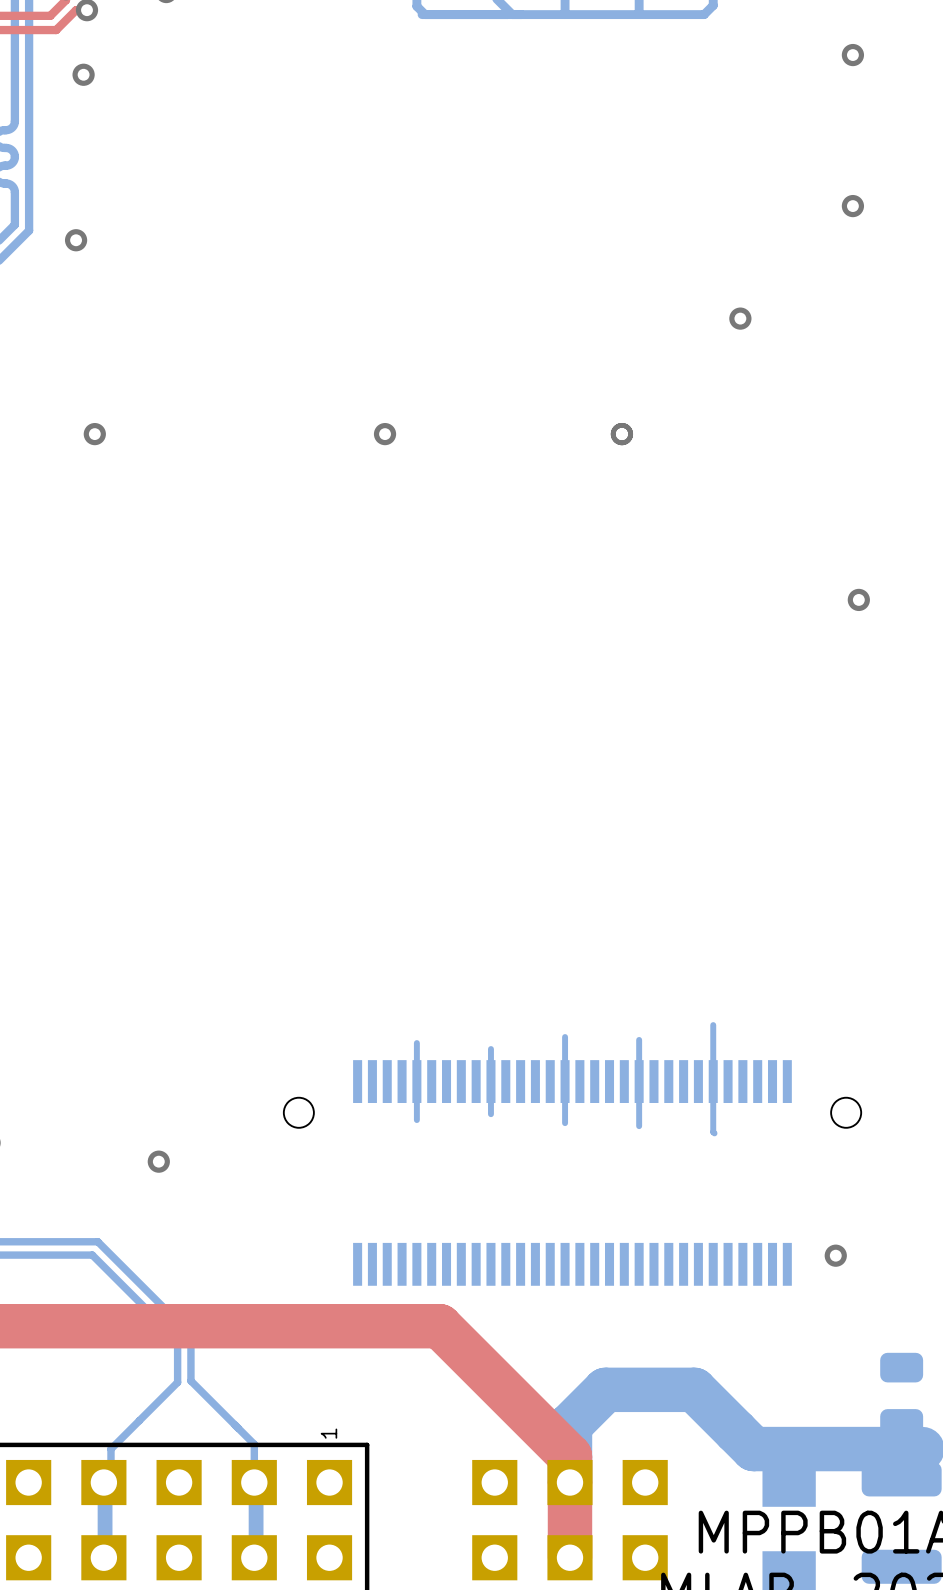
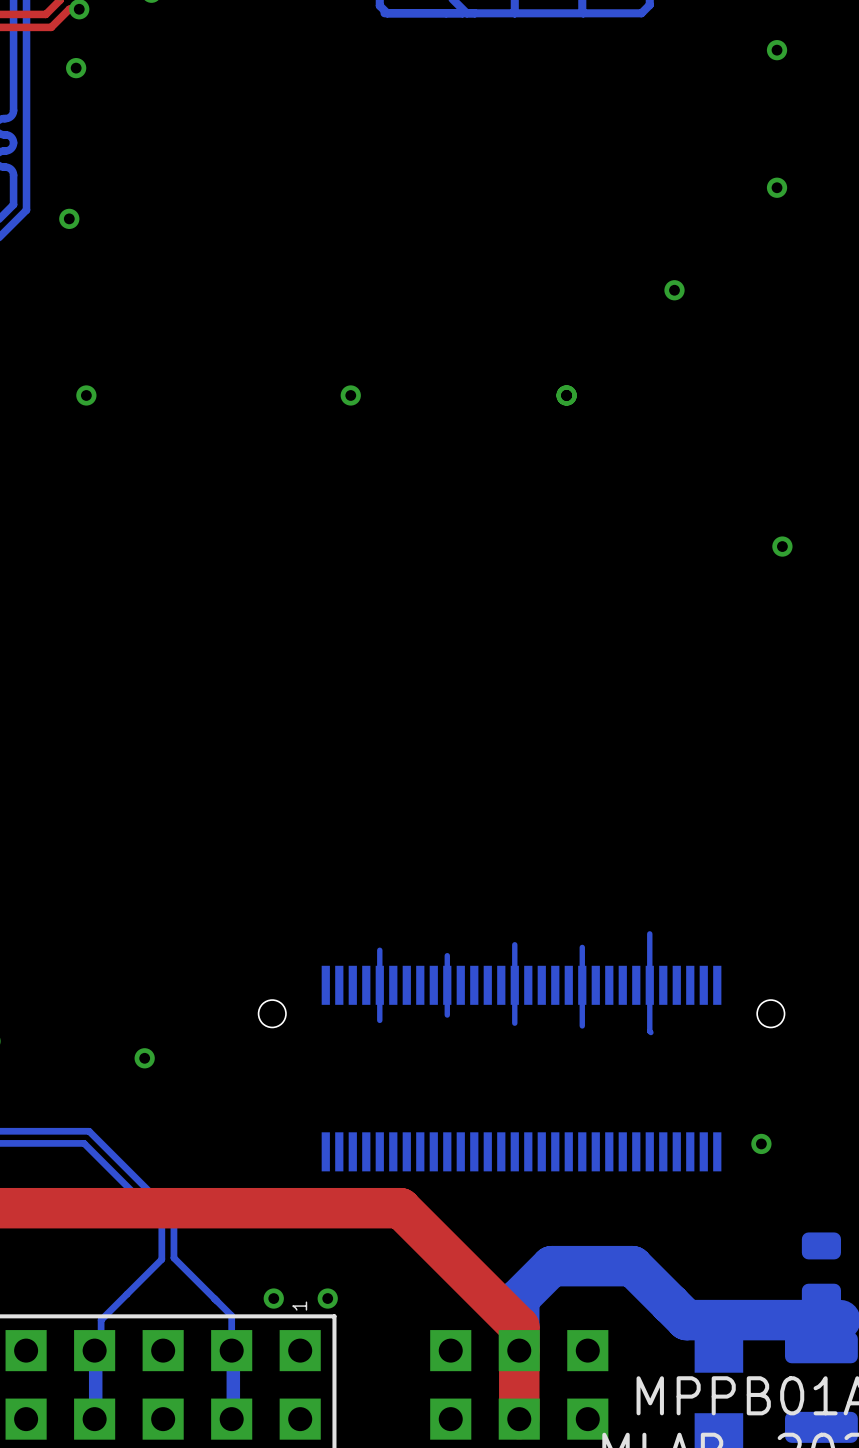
via: none -> (273, 1298)
via: none -> (327, 1298)

